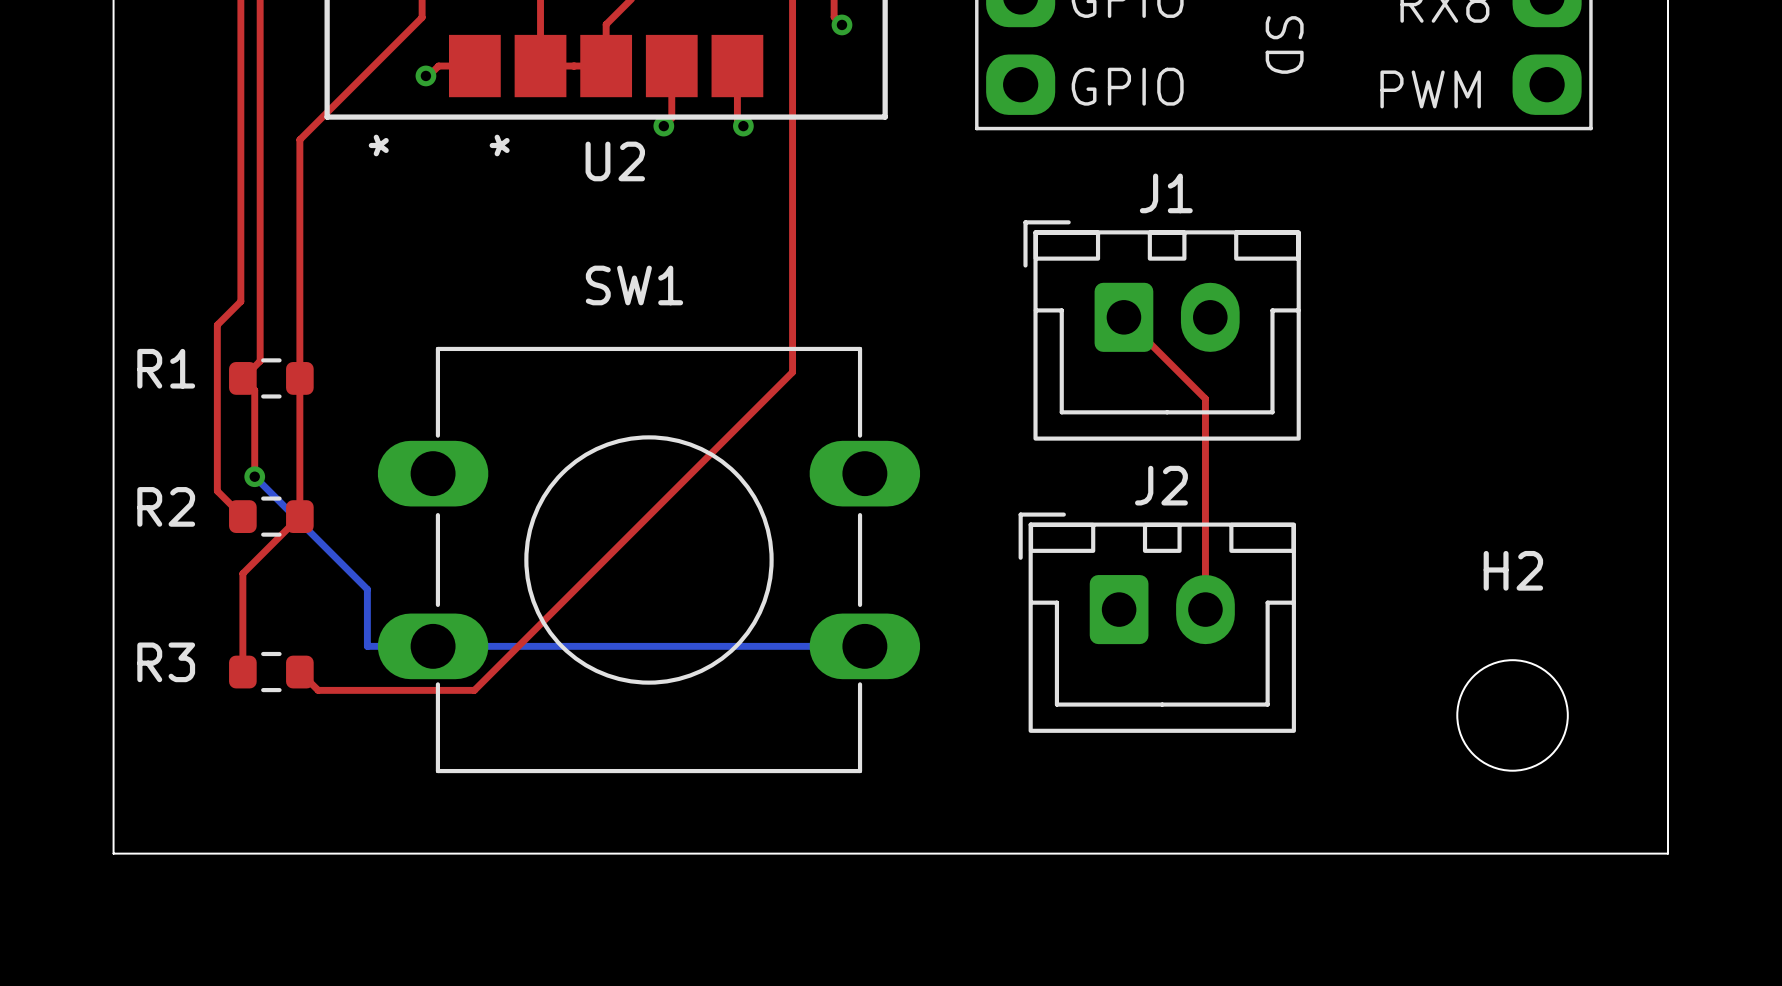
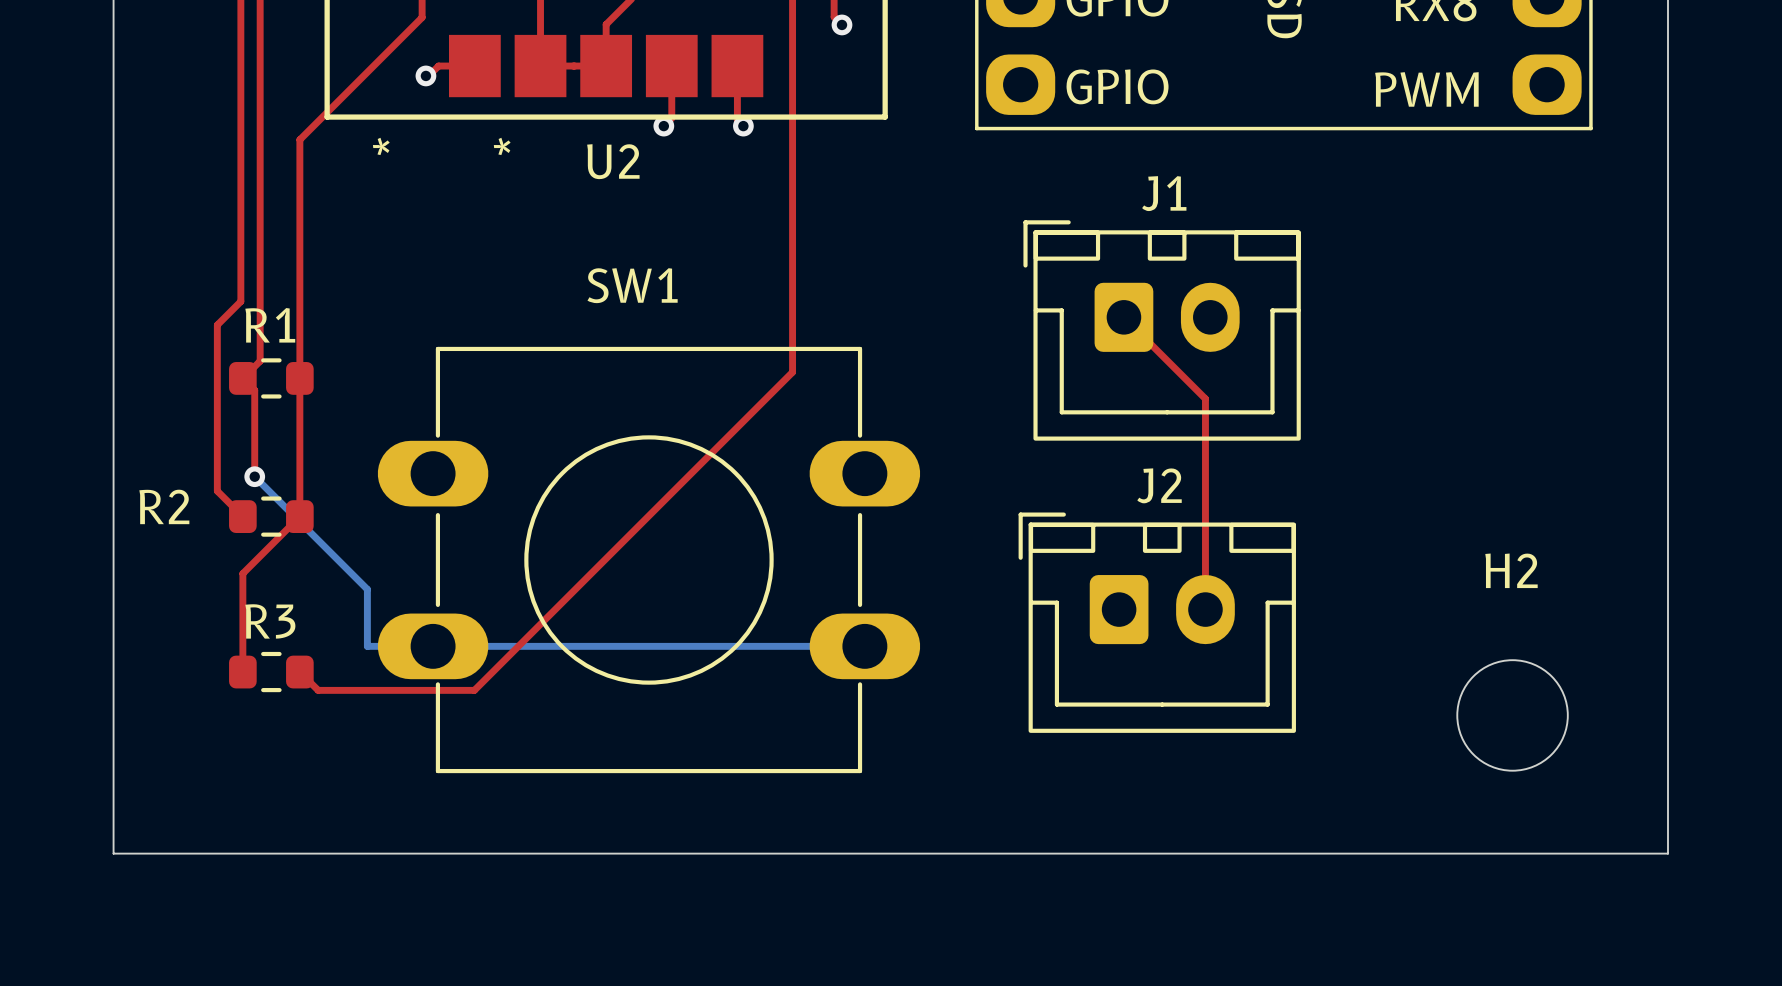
R1 name position: R1 (166, 368) -> R1 (270, 325)
R3 name position: R3 (166, 662) -> R3 (270, 621)

